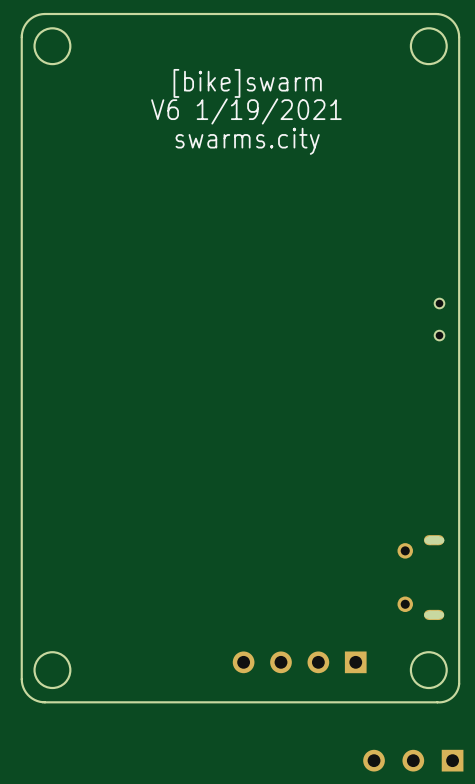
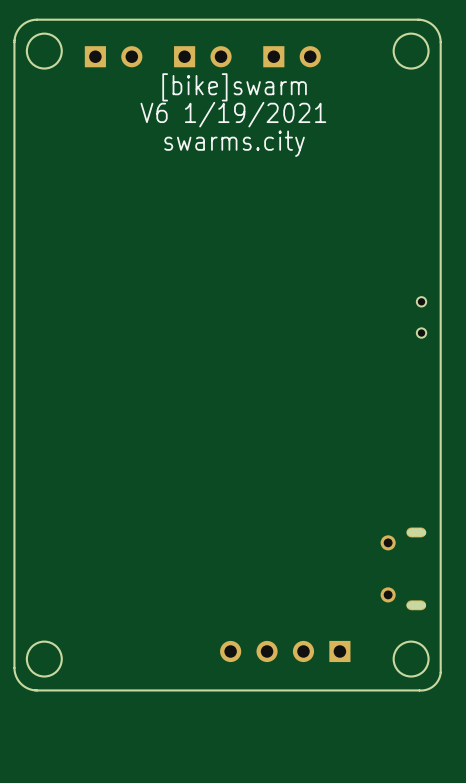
part: none -> (113, 56)
part: none -> (202, 56)
part: none -> (292, 56)
part: (413, 760) -> none

